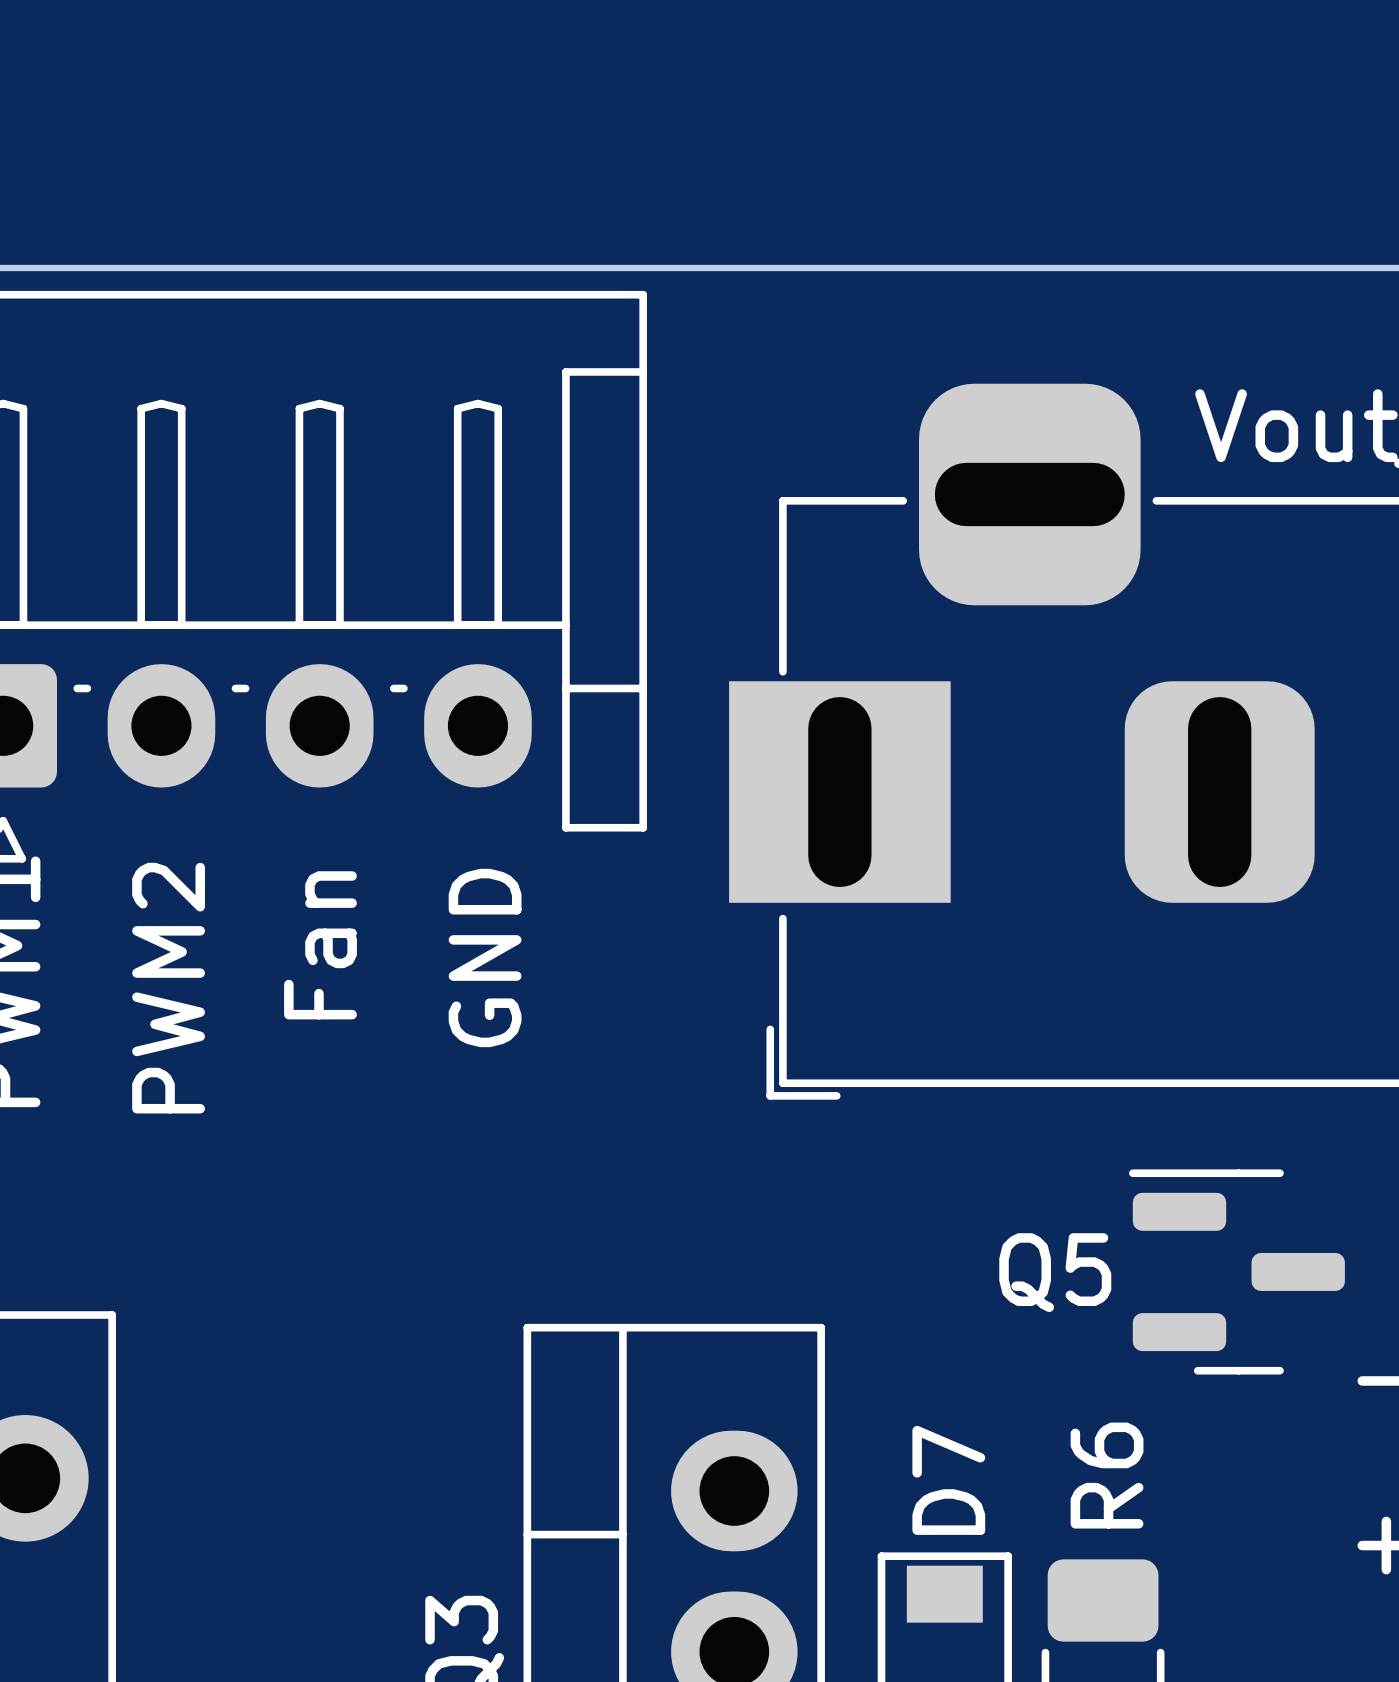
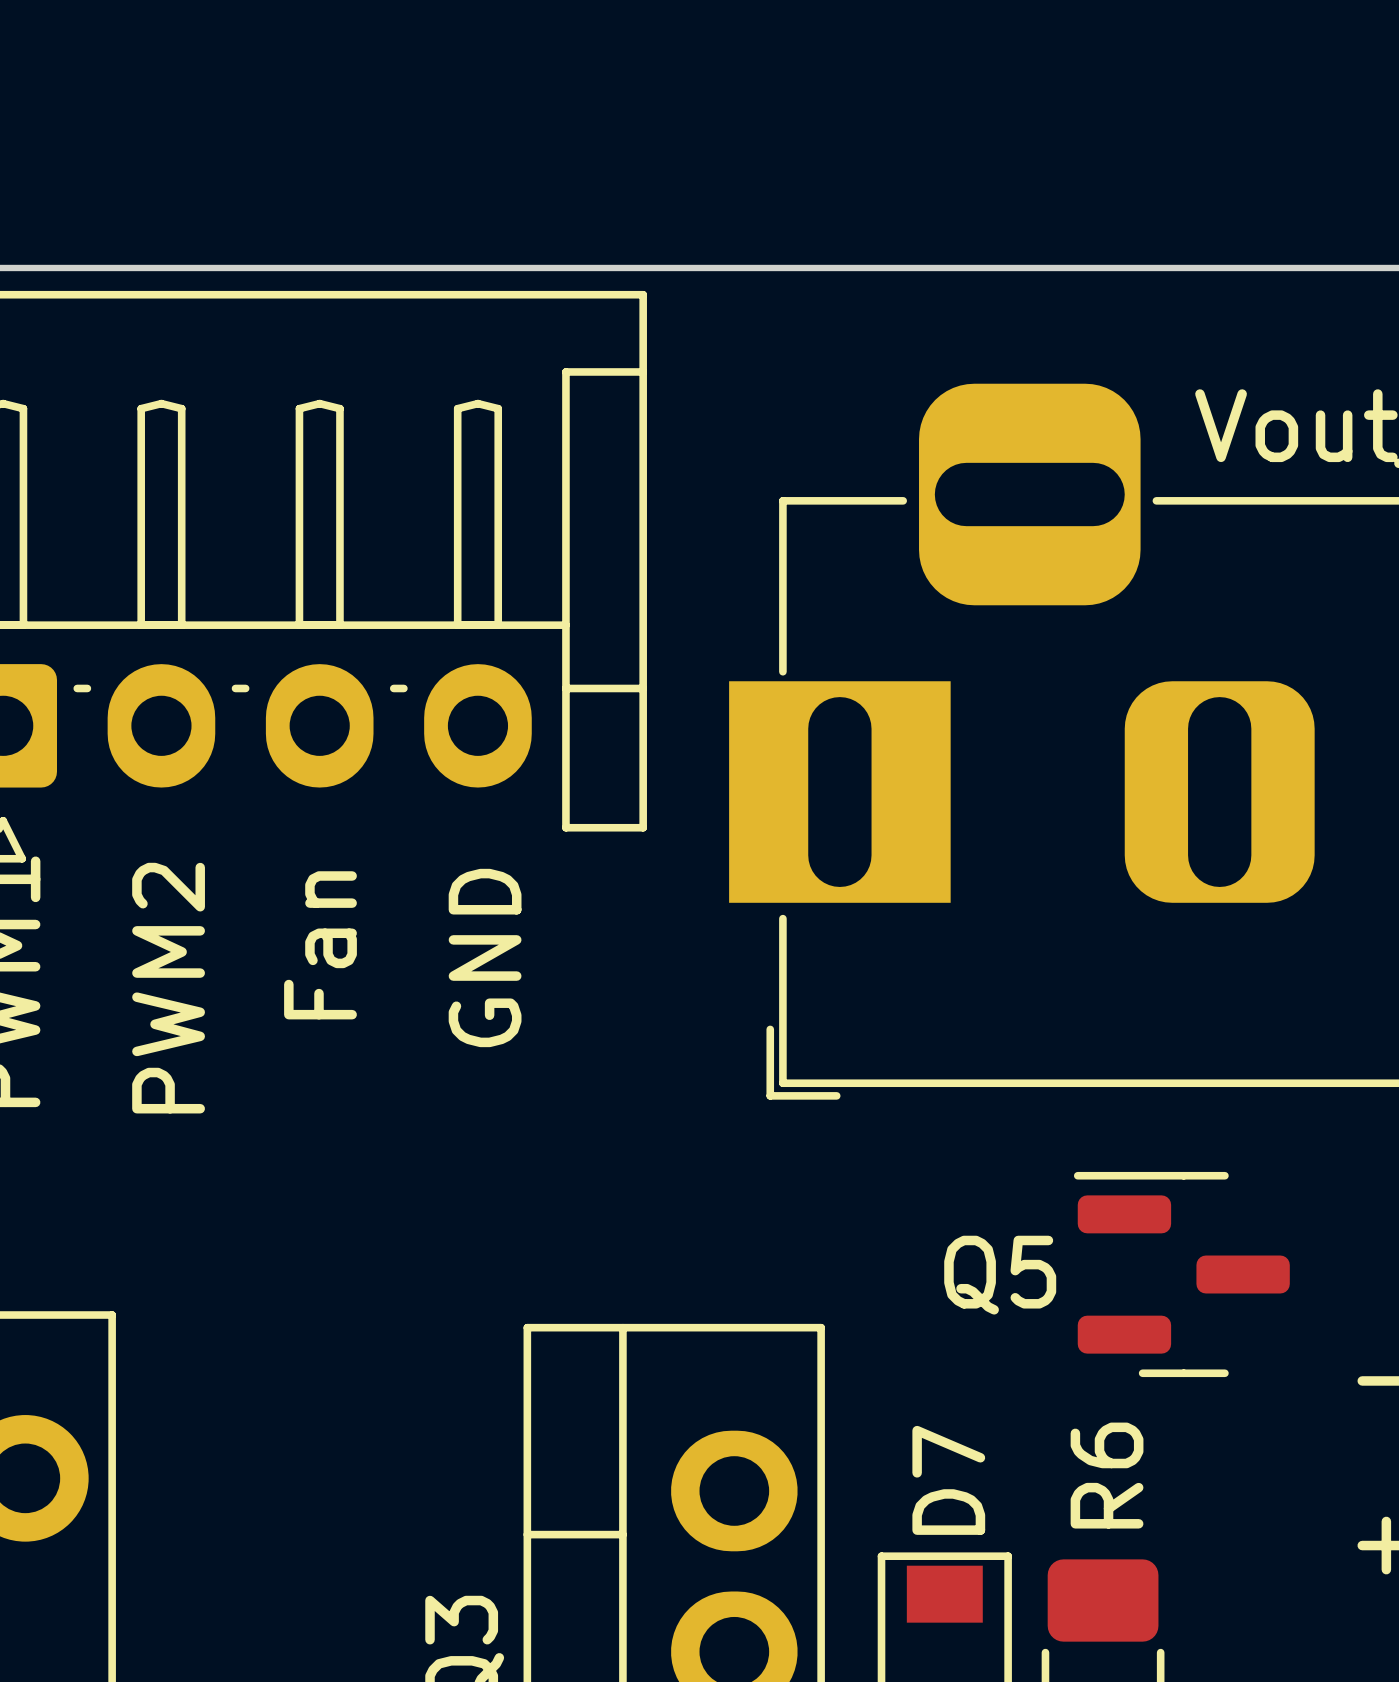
Q5 position: (1236, 1271) -> (1181, 1274)

